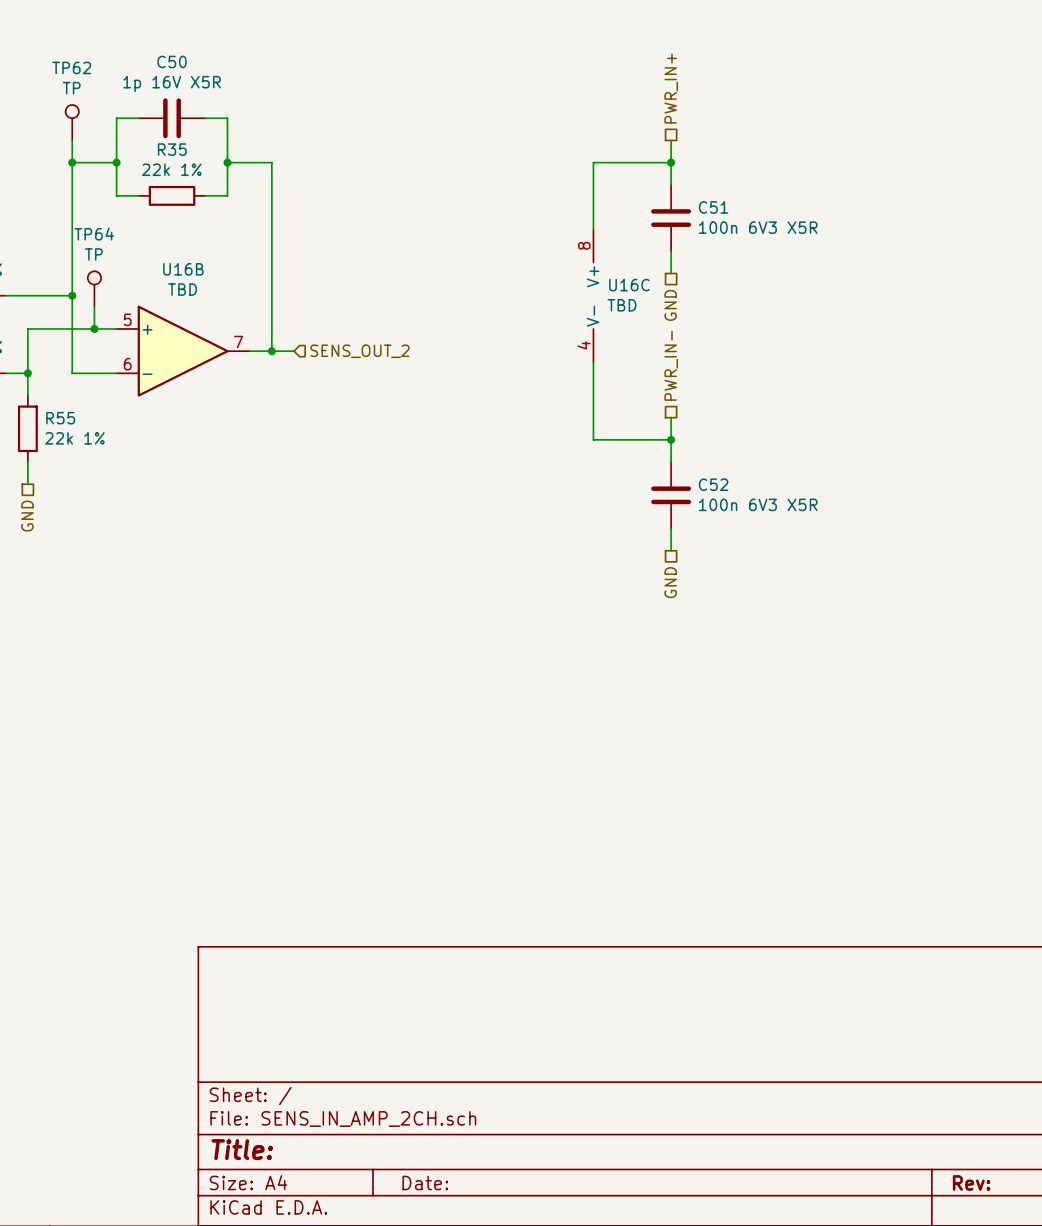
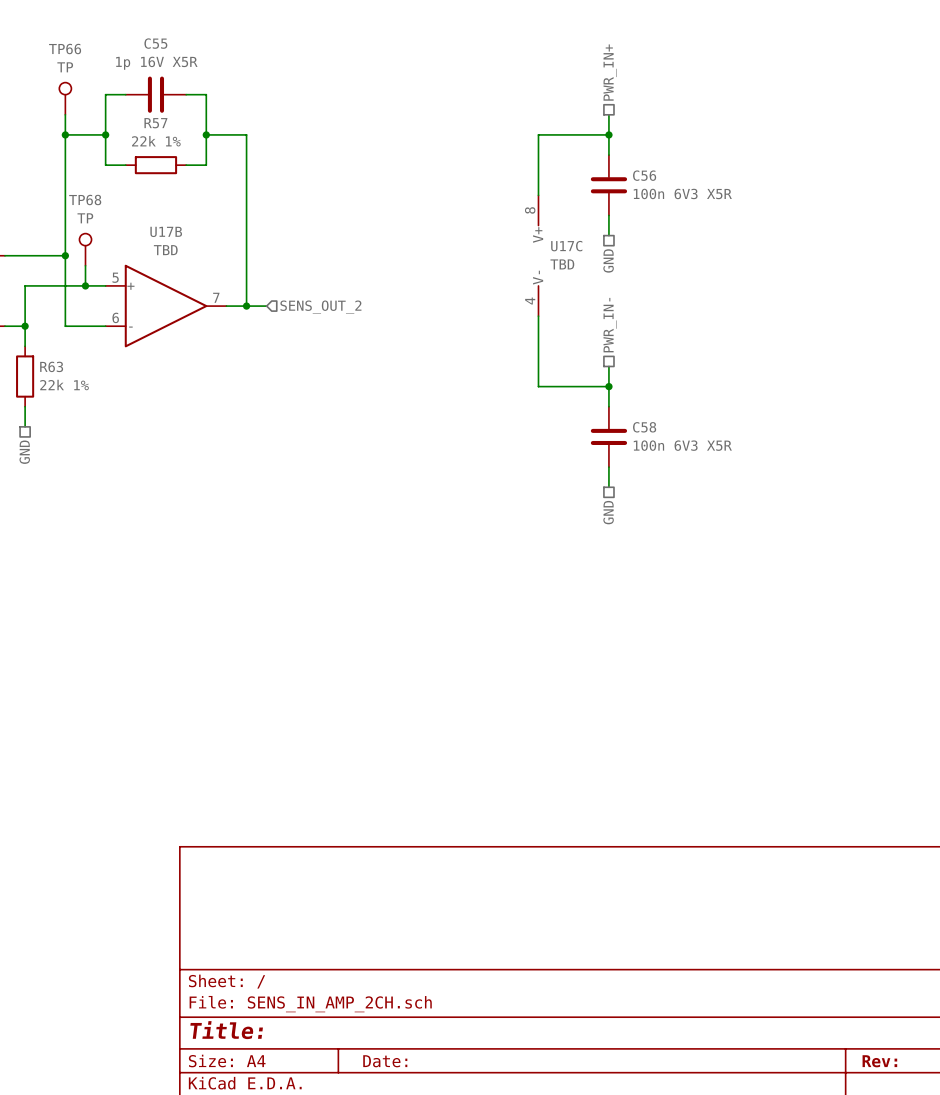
C50 name: C50 (172, 61) -> C55 (155, 43)
TP62 name: TP62 (71, 67) -> TP66 (65, 49)
R35 name: R35 (172, 149) -> R57 (155, 123)
C51 name: C51 (713, 207) -> C56 (644, 175)
TP64 name: TP64 (94, 234) -> TP68 (85, 200)
U16B name: U16B (183, 269) -> U17B (166, 231)
U16C name: U16C (629, 285) -> U17C (566, 246)
R55 name: R55 (60, 418) -> R63 (51, 366)
C52 name: C52 (713, 484) -> C58 (644, 427)

